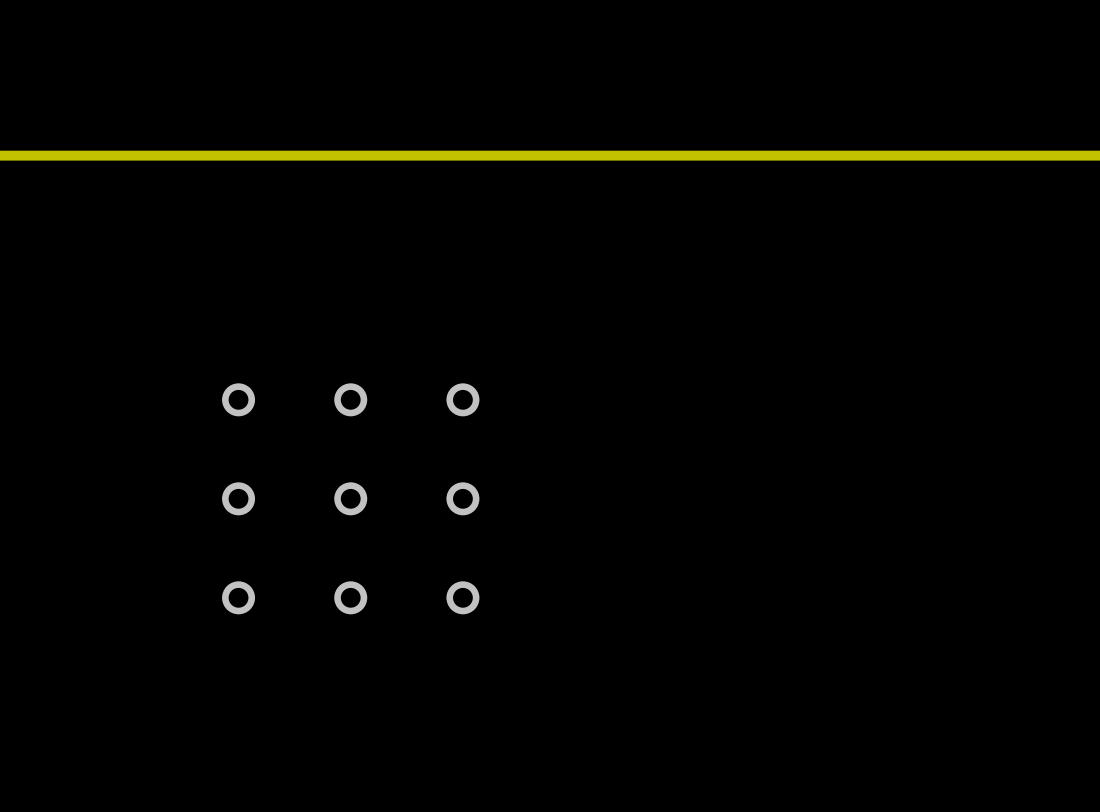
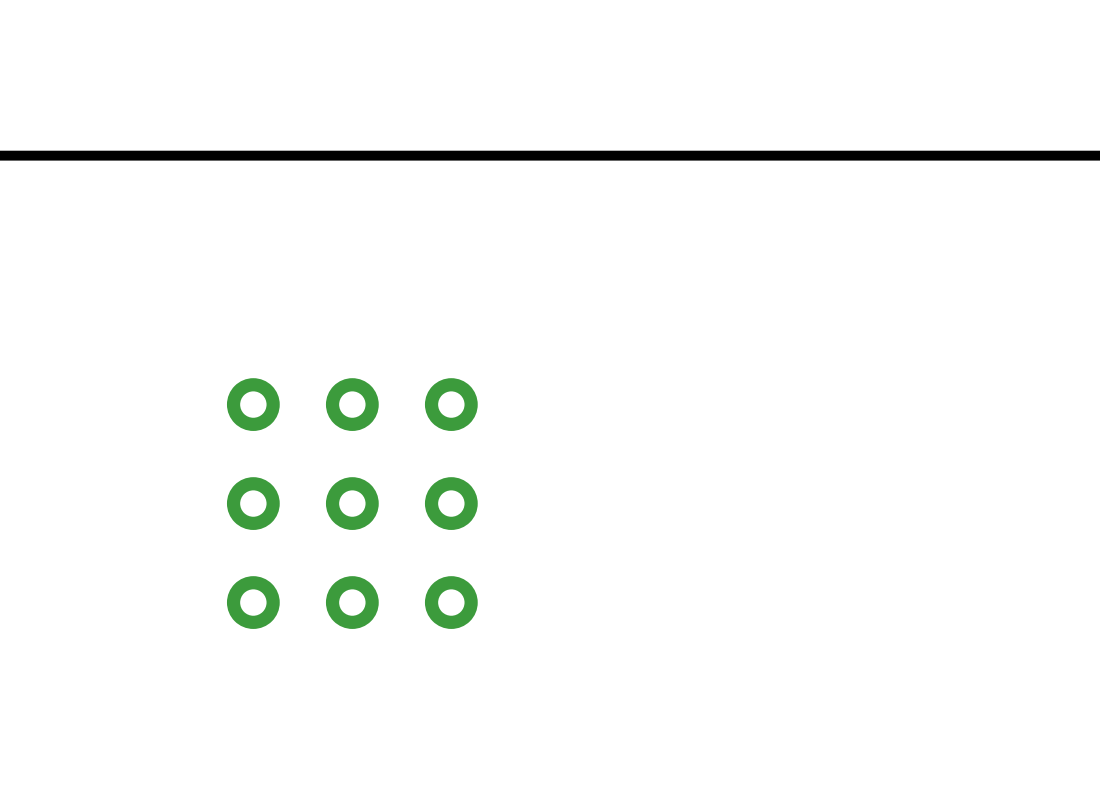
via size: [222, 383, 256, 417] -> [226, 378, 280, 431]
via size: [334, 383, 368, 417] -> [325, 378, 379, 431]
via size: [446, 383, 480, 417] -> [424, 378, 478, 431]
via size: [222, 482, 256, 516] -> [226, 477, 280, 530]
via size: [334, 482, 368, 516] -> [325, 477, 379, 530]
via size: [446, 482, 480, 516] -> [424, 477, 478, 530]
via size: [222, 581, 256, 615] -> [226, 576, 280, 629]
via size: [334, 581, 368, 615] -> [325, 576, 379, 629]
via size: [446, 581, 480, 615] -> [424, 576, 478, 629]

